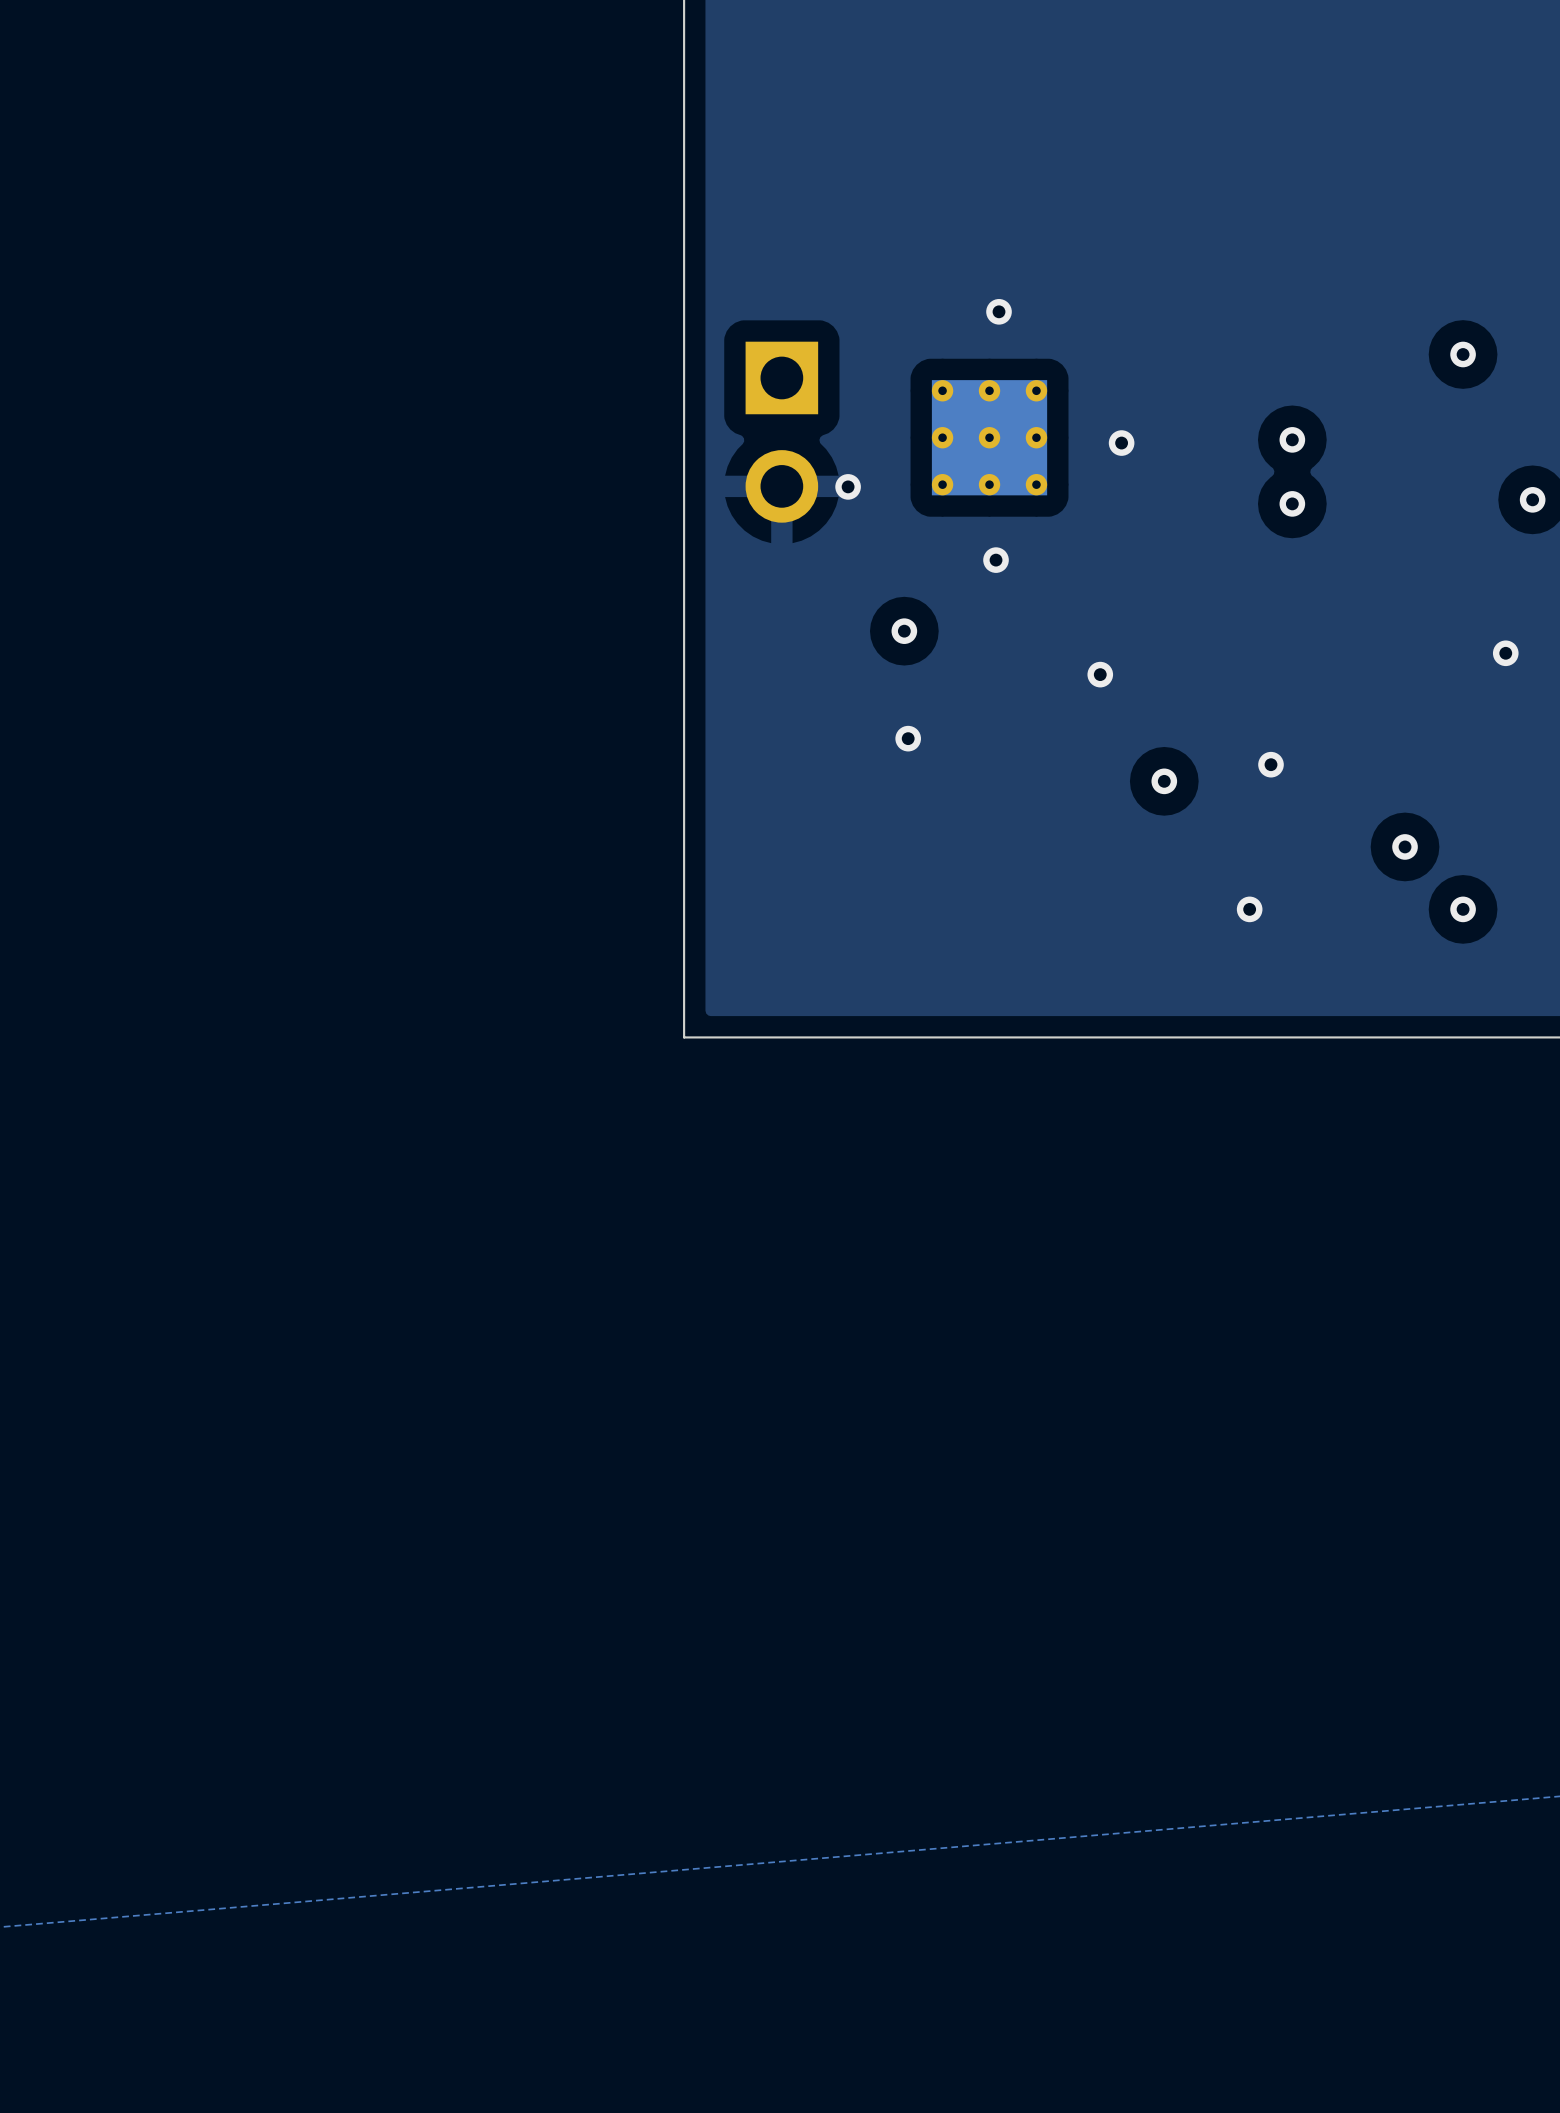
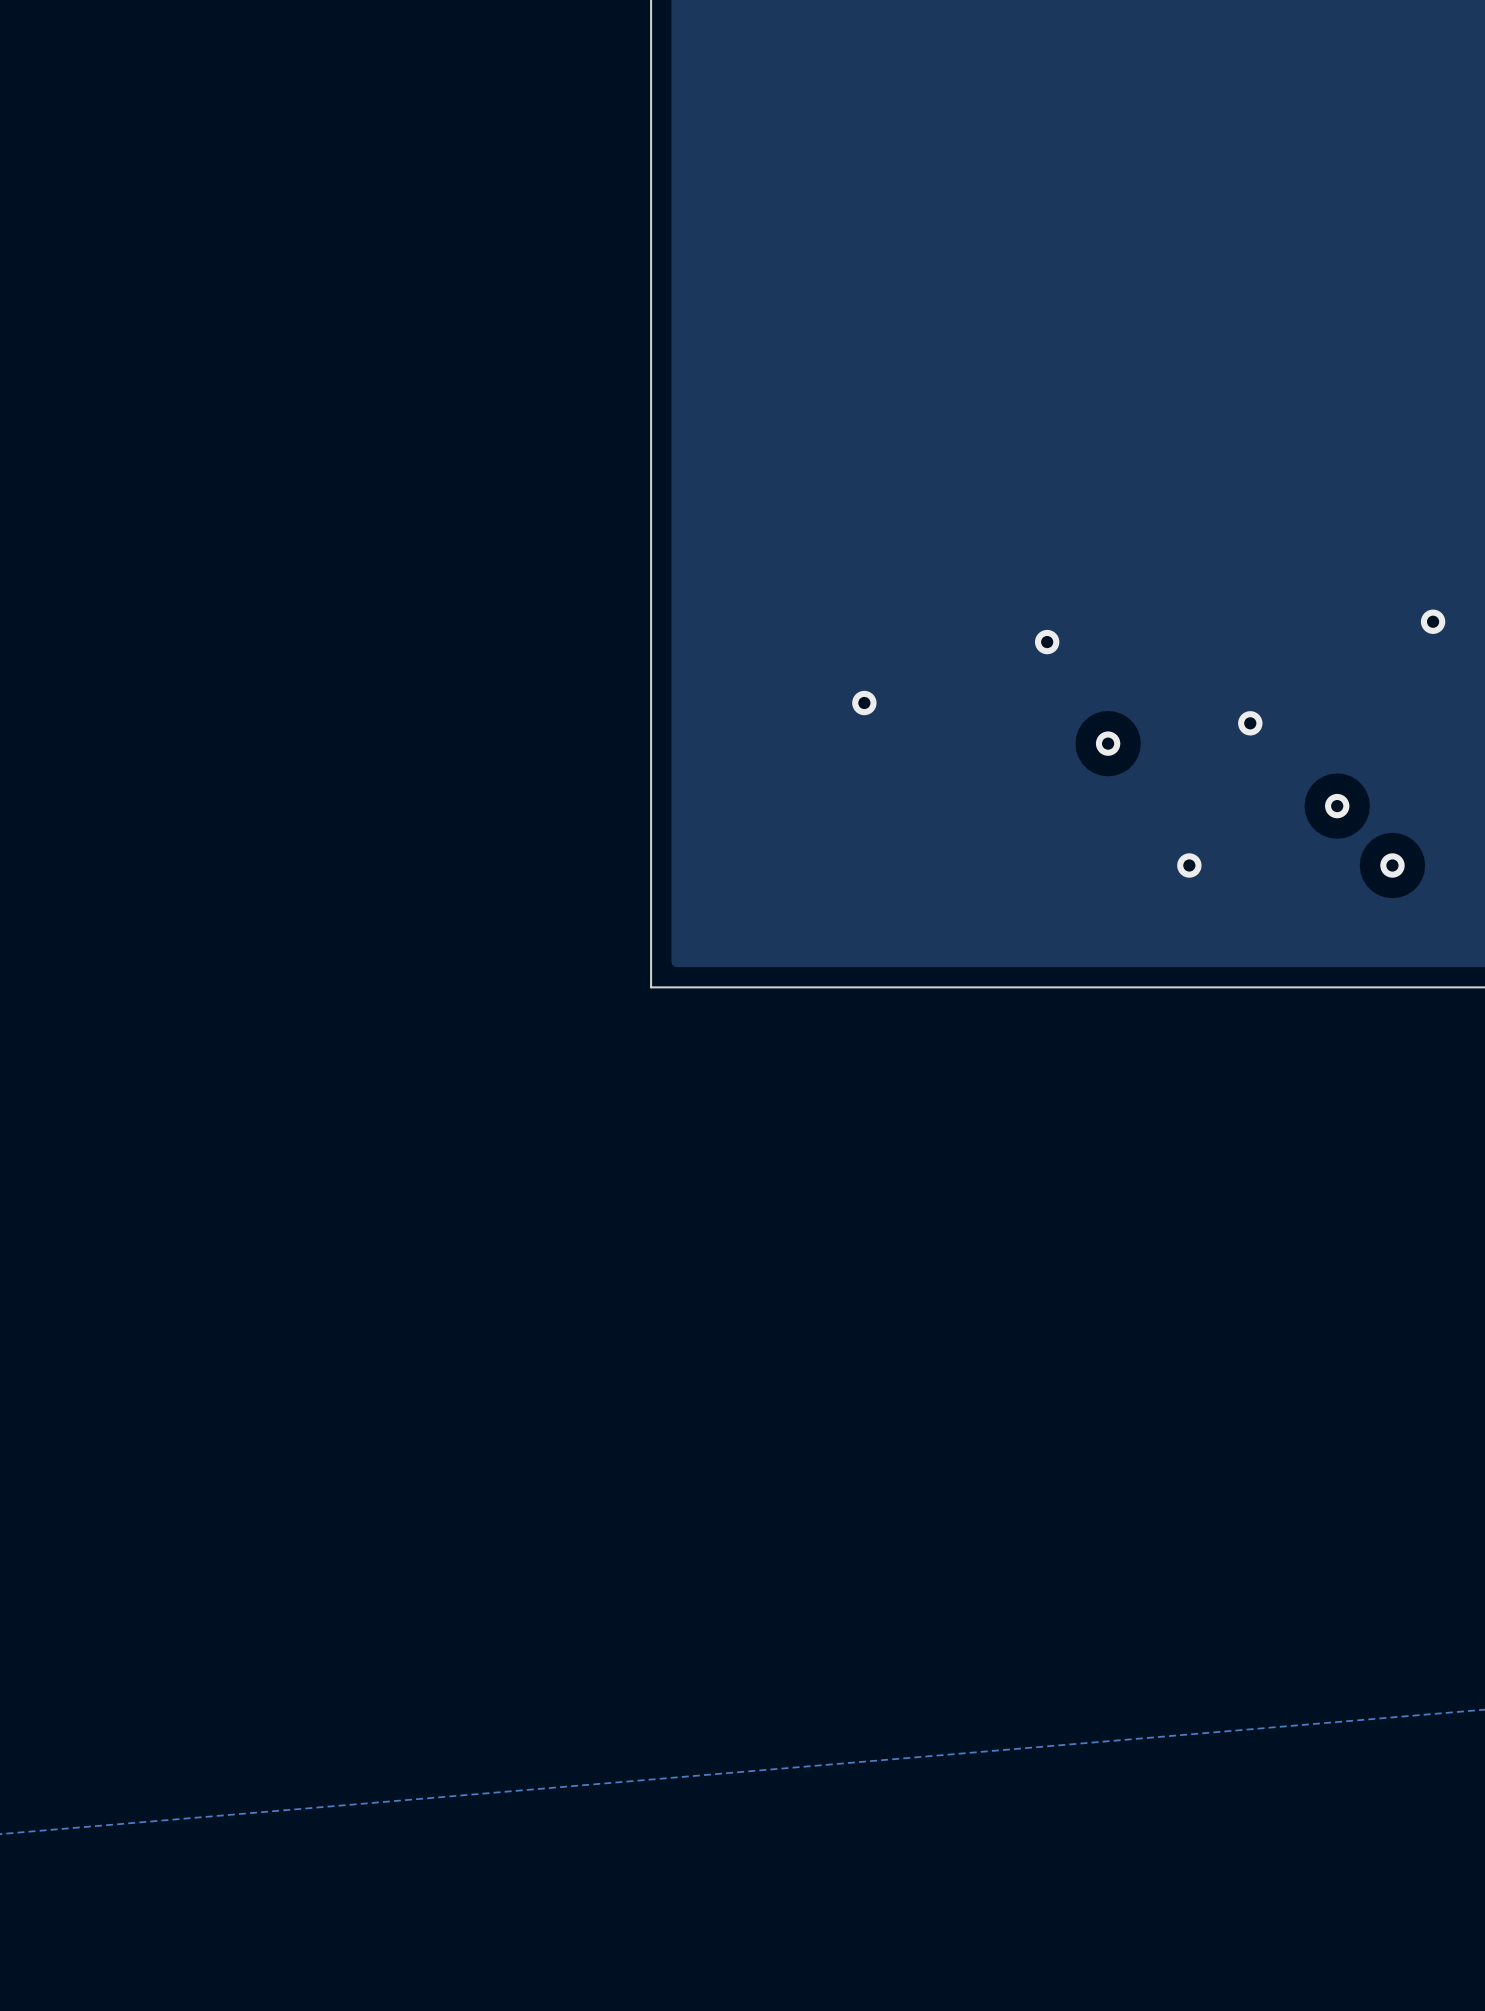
via: (999, 311) -> none
via: (1463, 354) -> none
part: (781, 432) -> none
part: (989, 437) -> none
via: (1292, 439) -> none
via: (1121, 443) -> none
via: (848, 486) -> none
via: (1532, 499) -> none
via: (1292, 503) -> none
via: (996, 560) -> none
via: (904, 631) -> none
via position: (1271, 764) -> (1250, 723)

